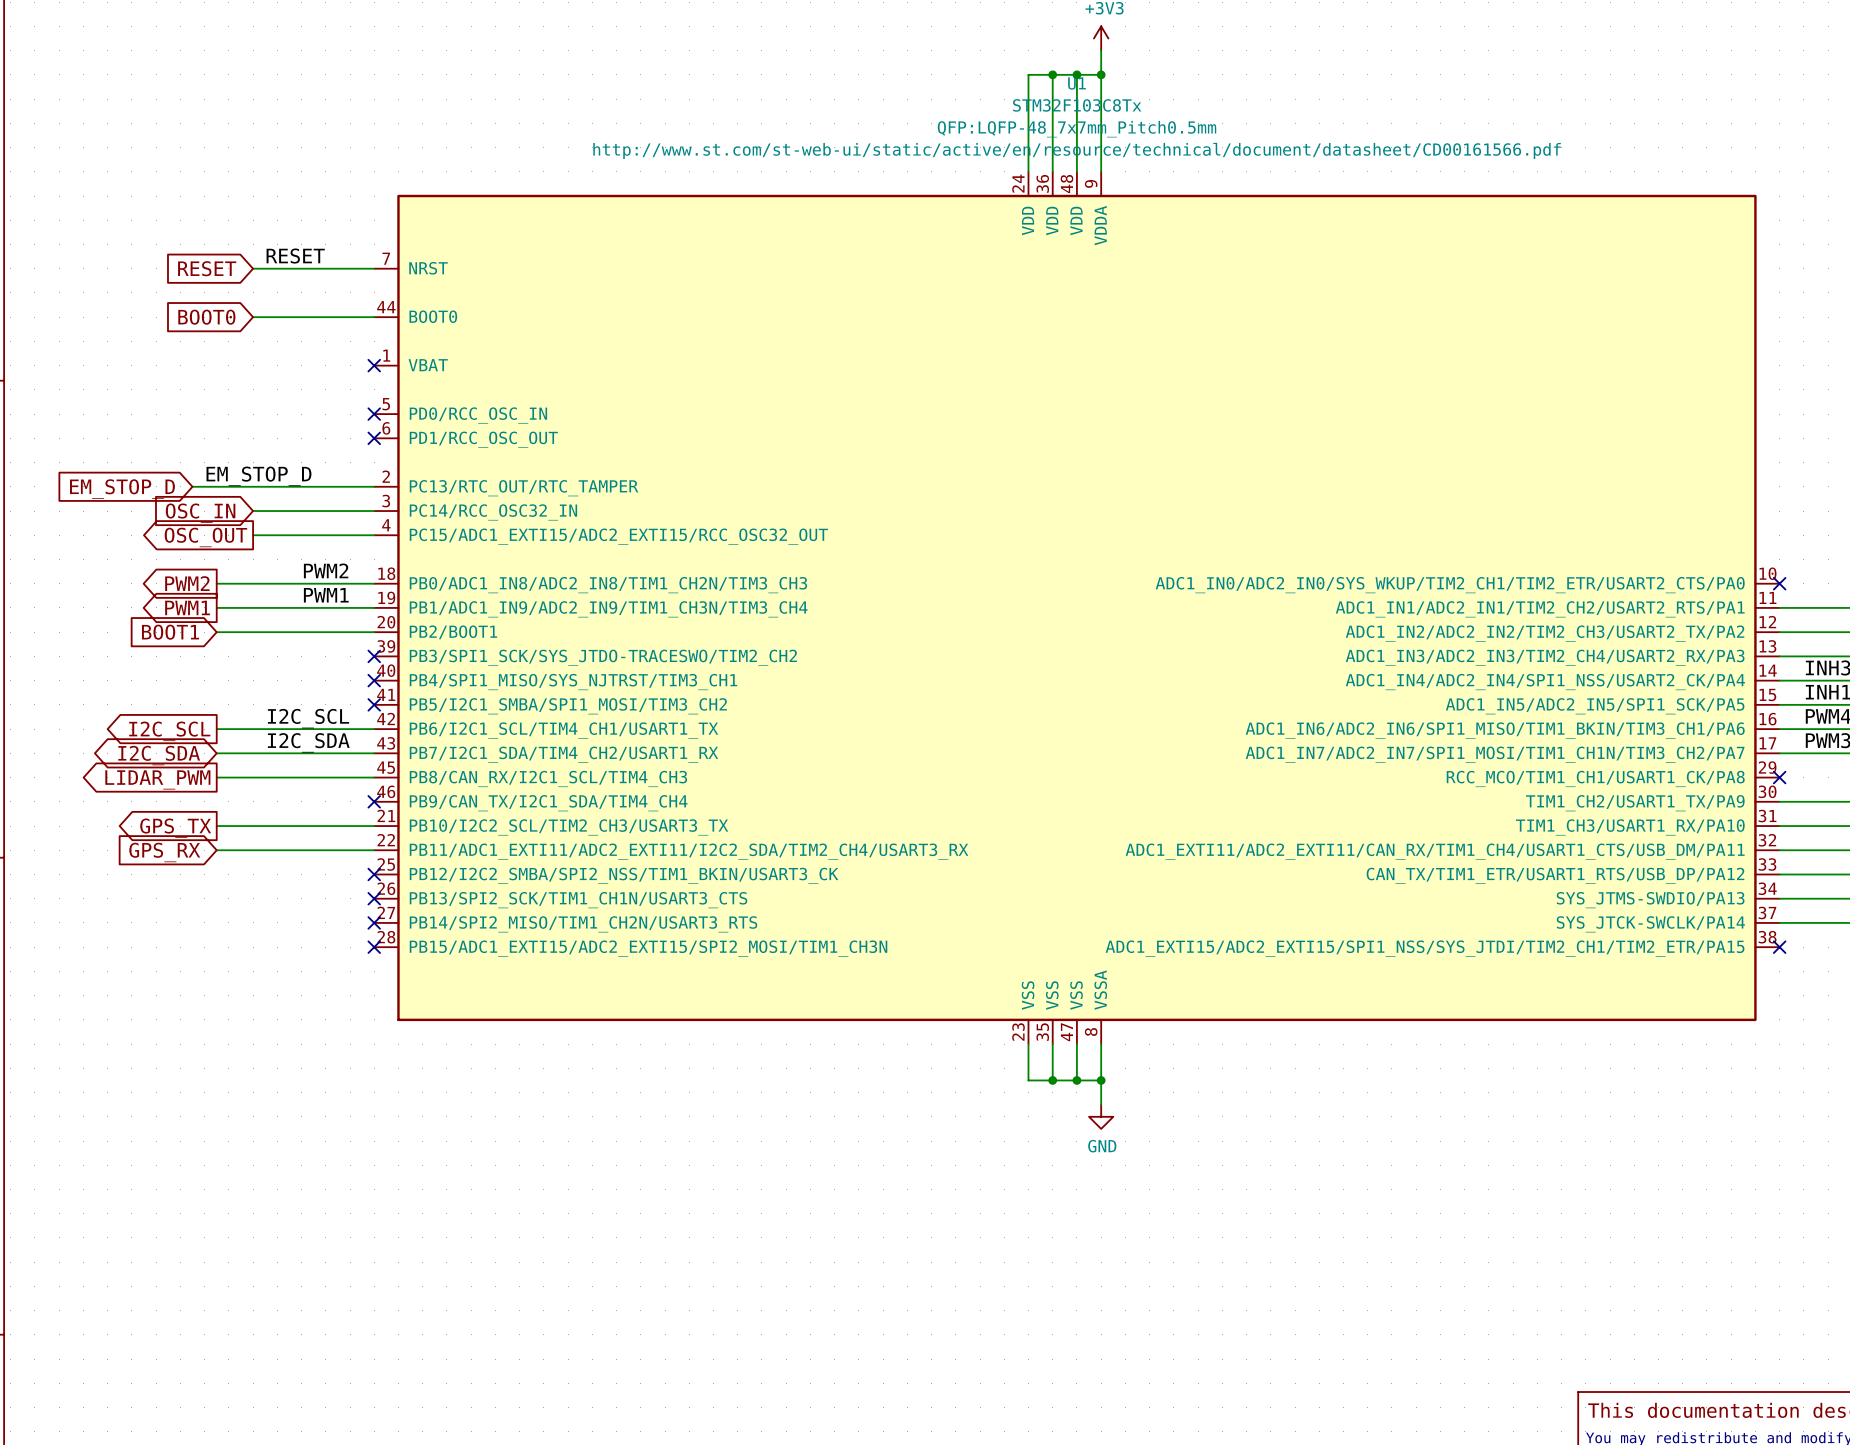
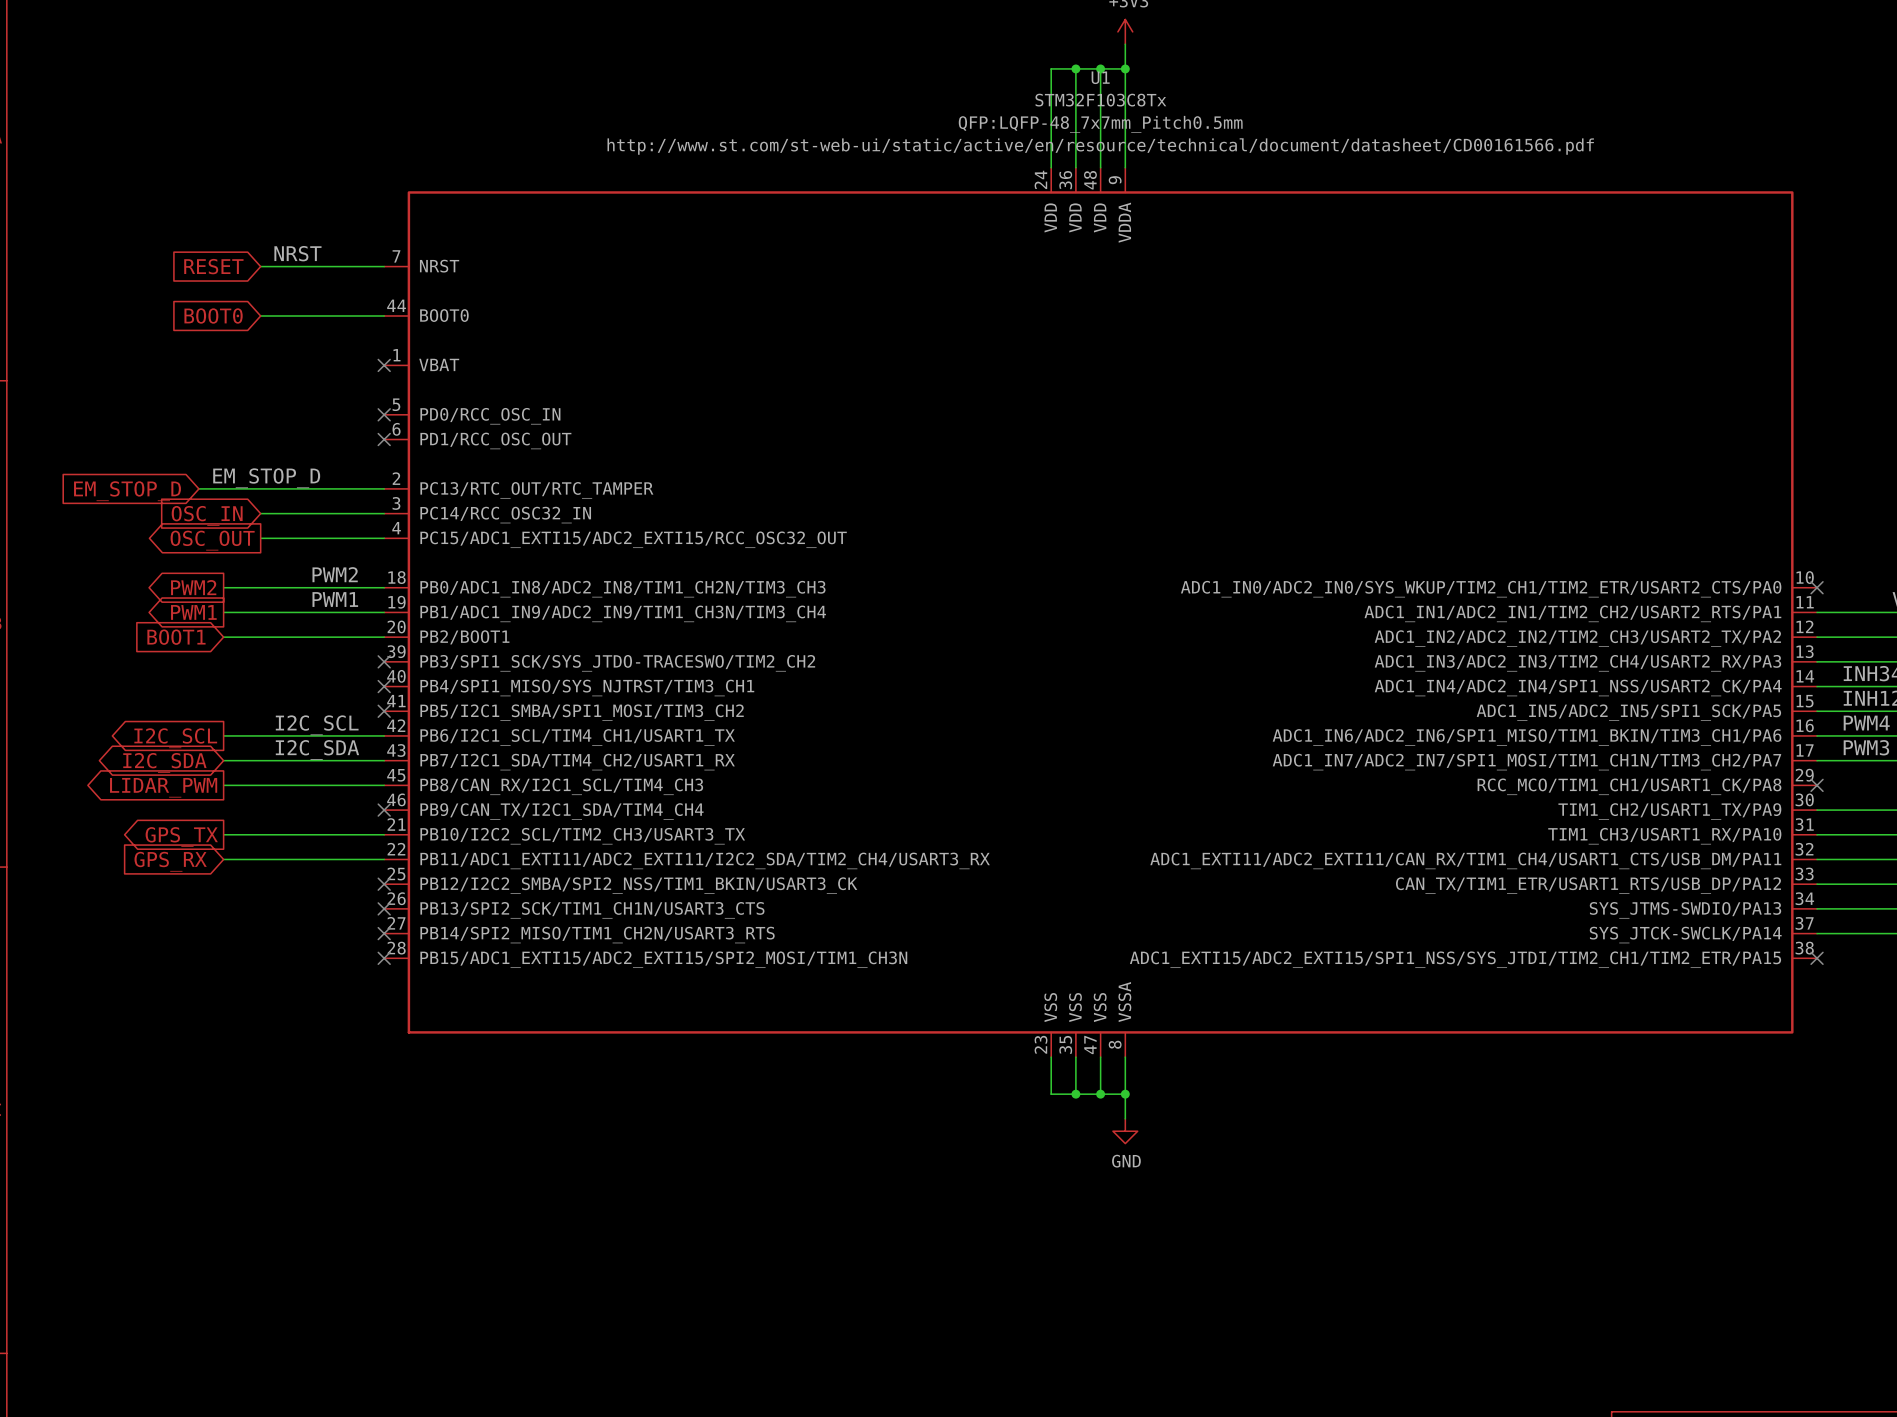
label: RESET (295, 256) -> NRST (297, 253)

